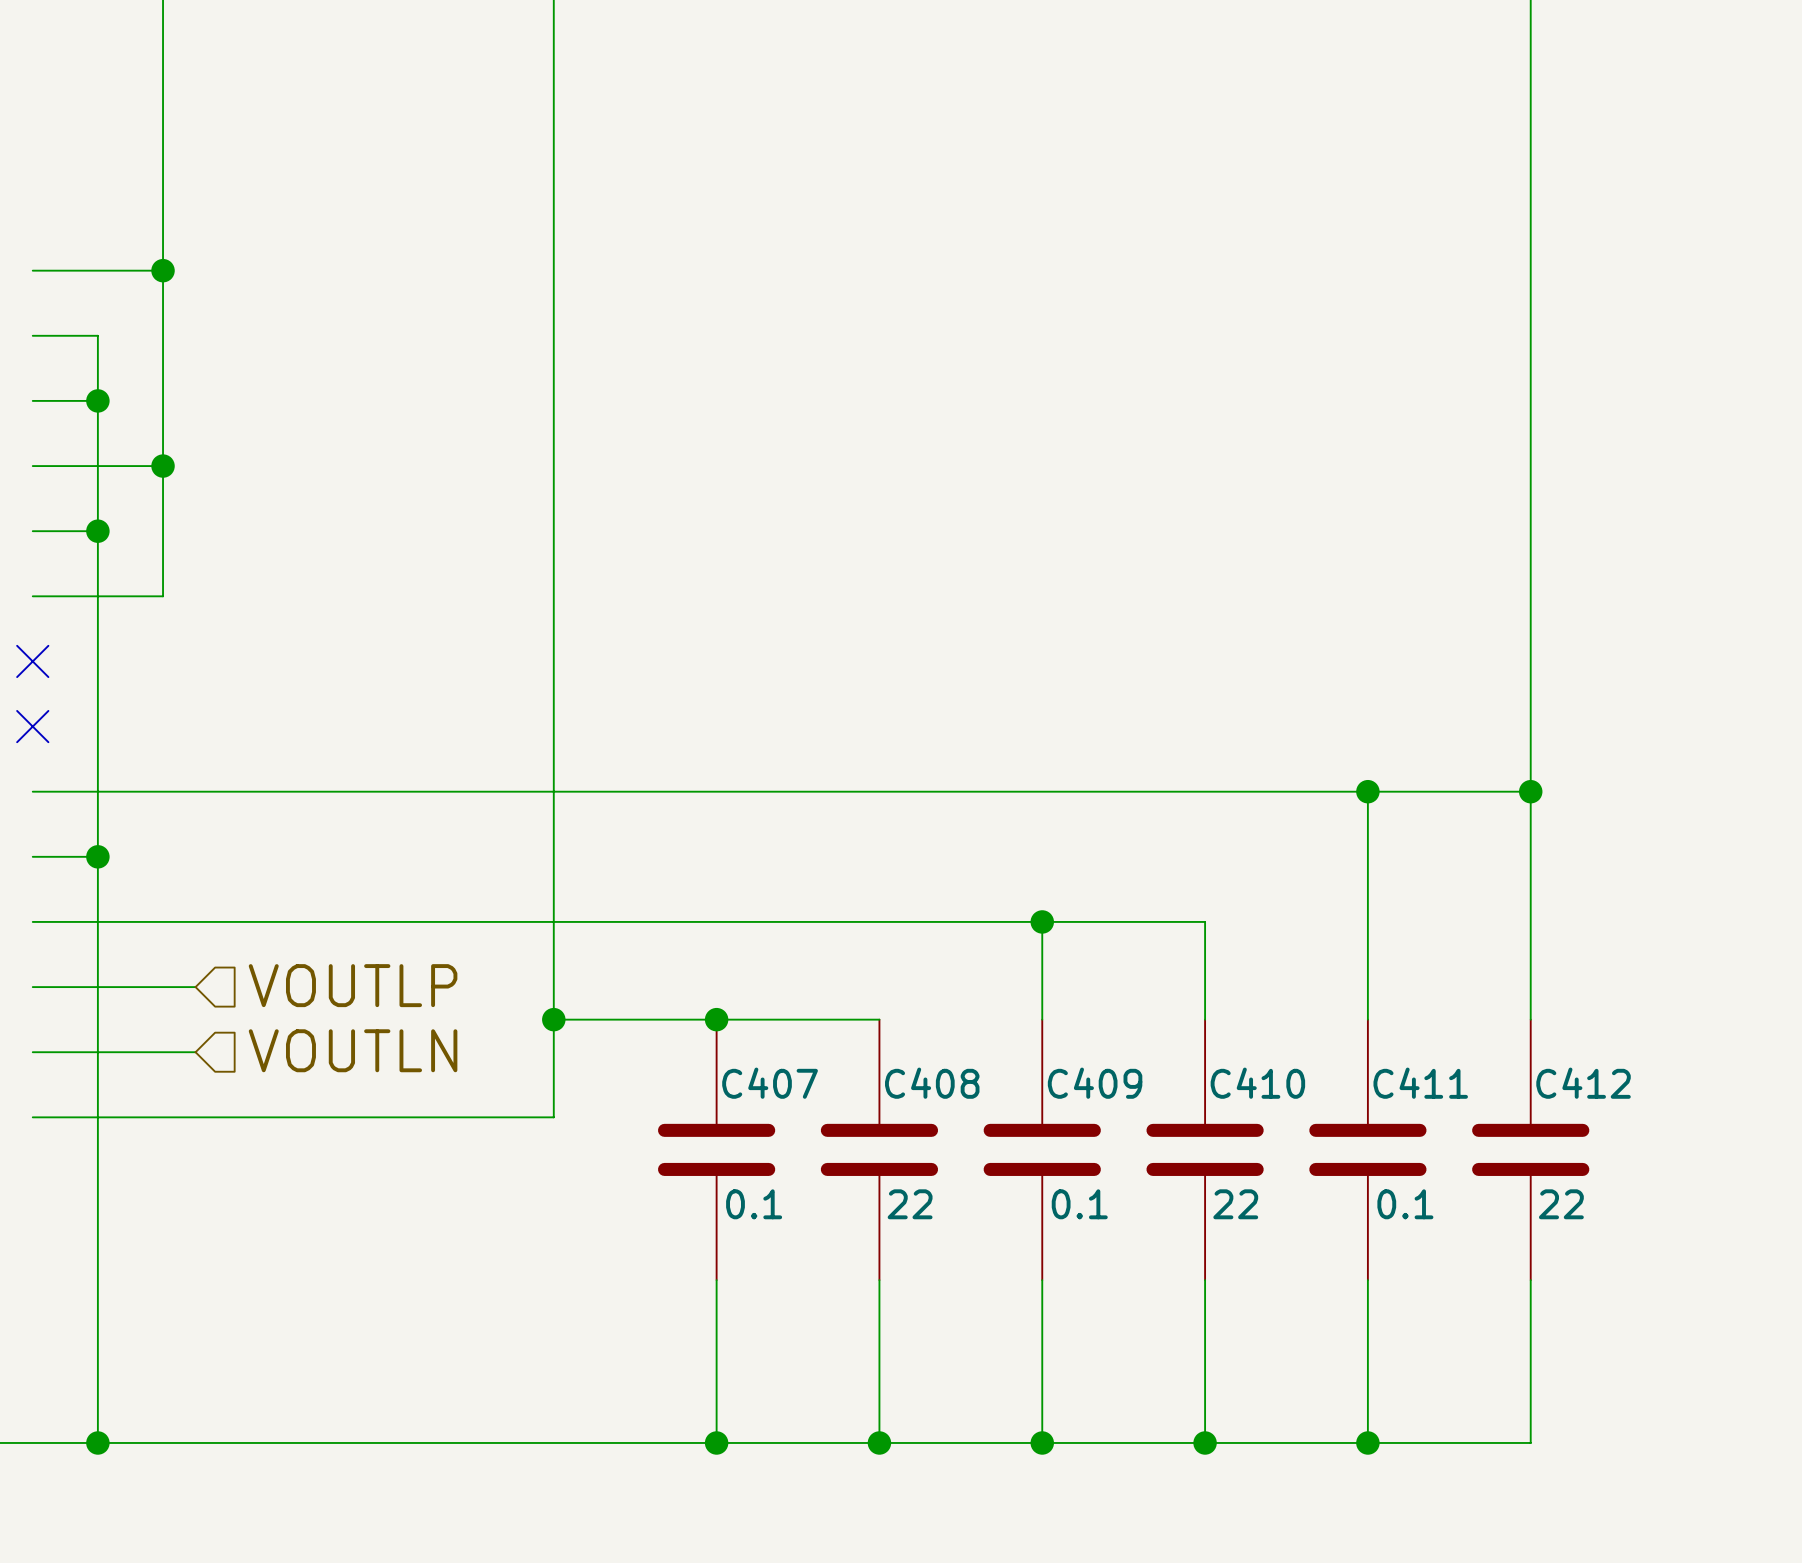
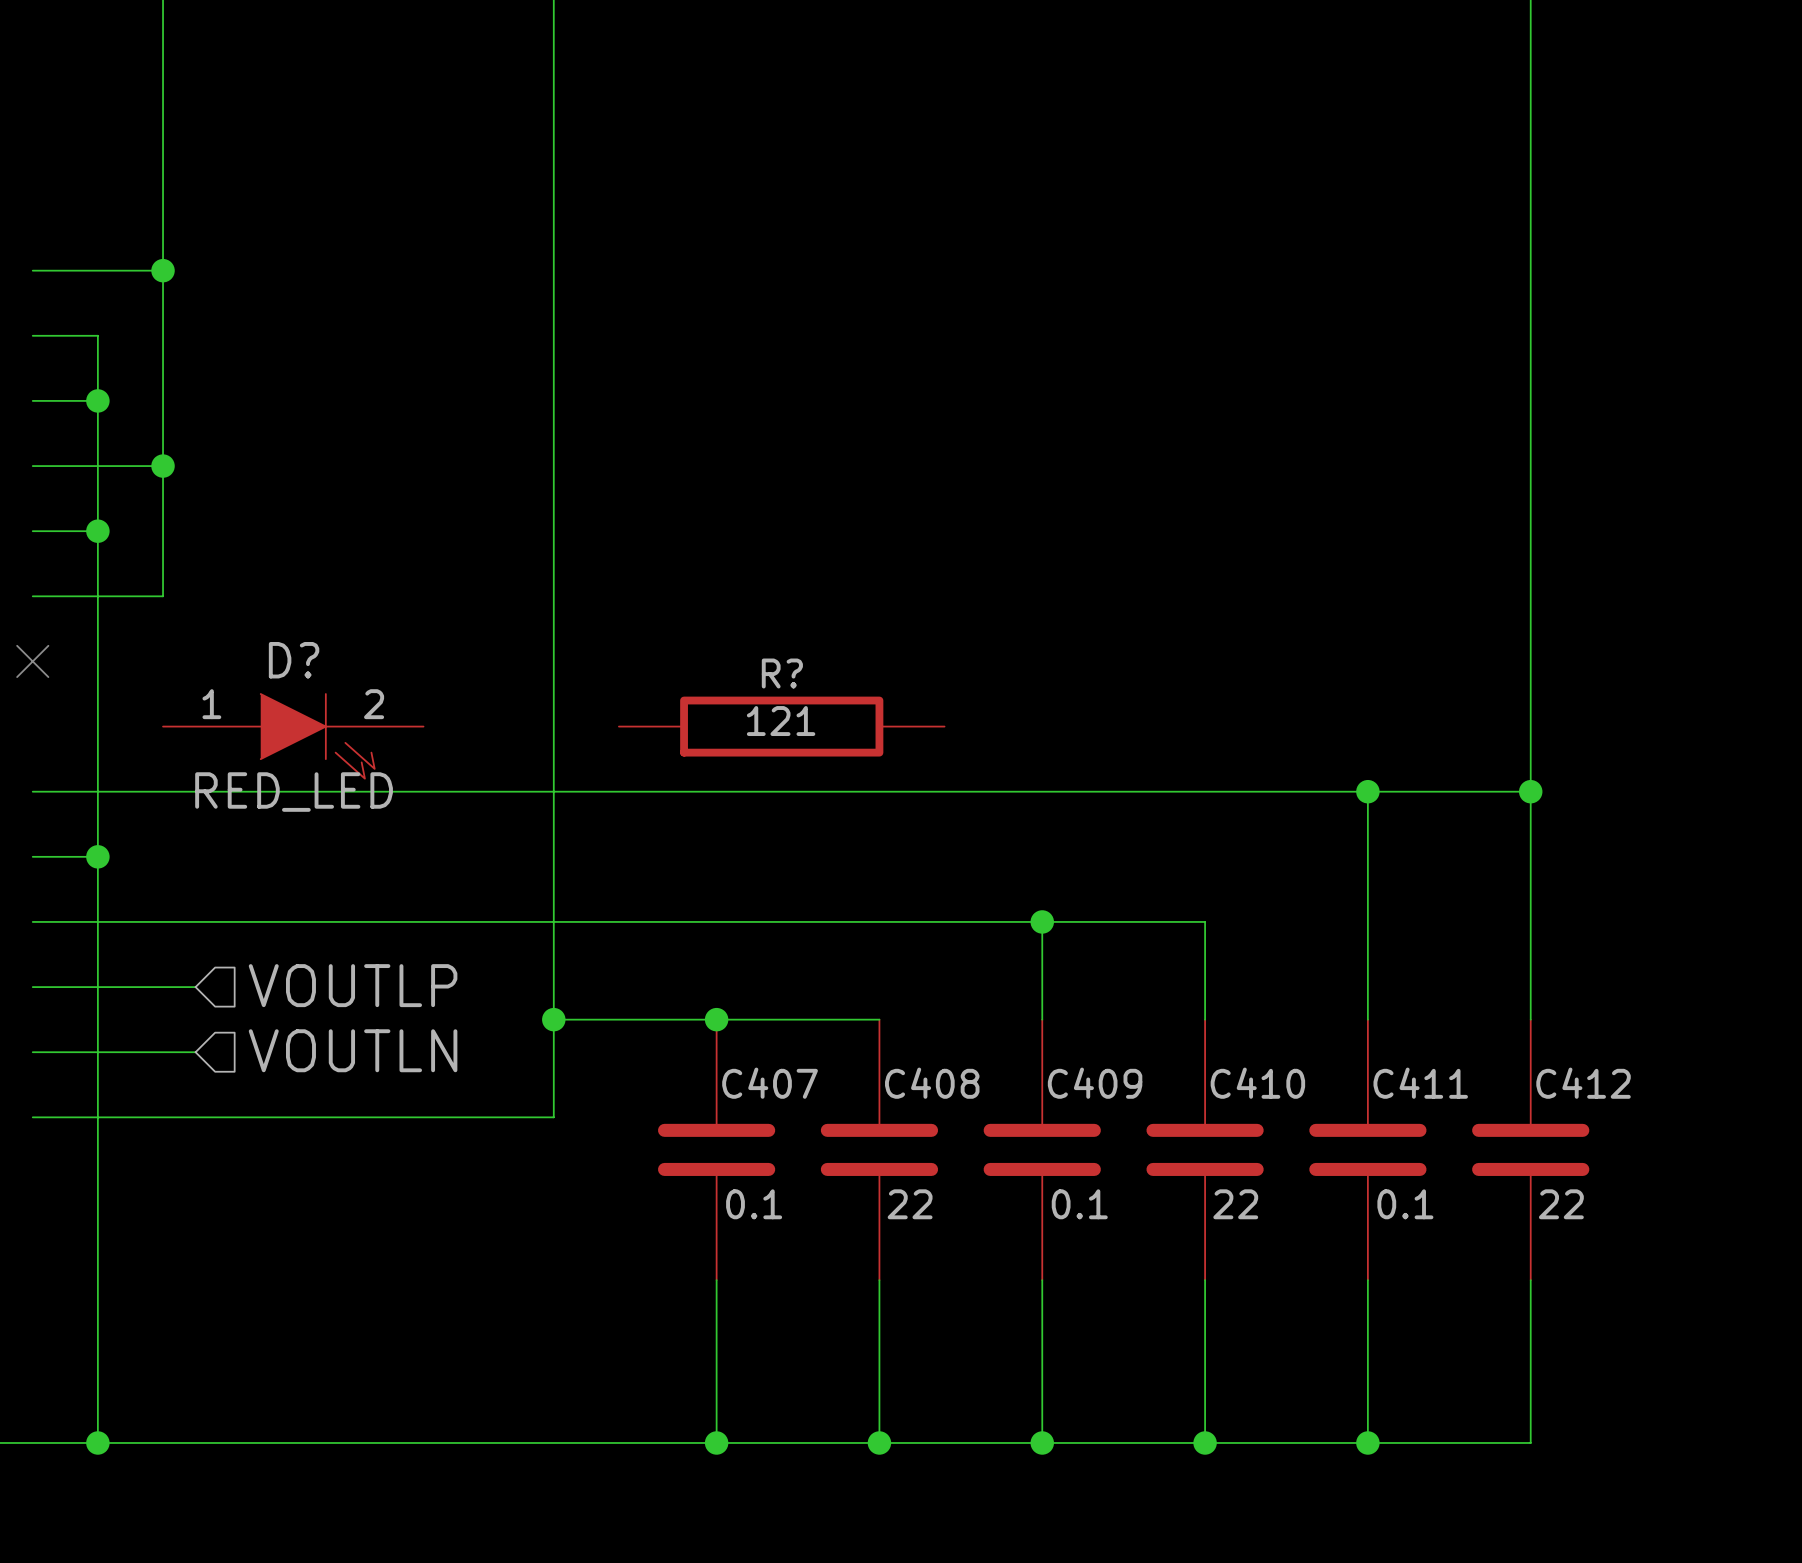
no-connect mark: (32, 726) -> none
R?: none -> 121 (781, 726)
D?: none -> RED_LED (293, 736)

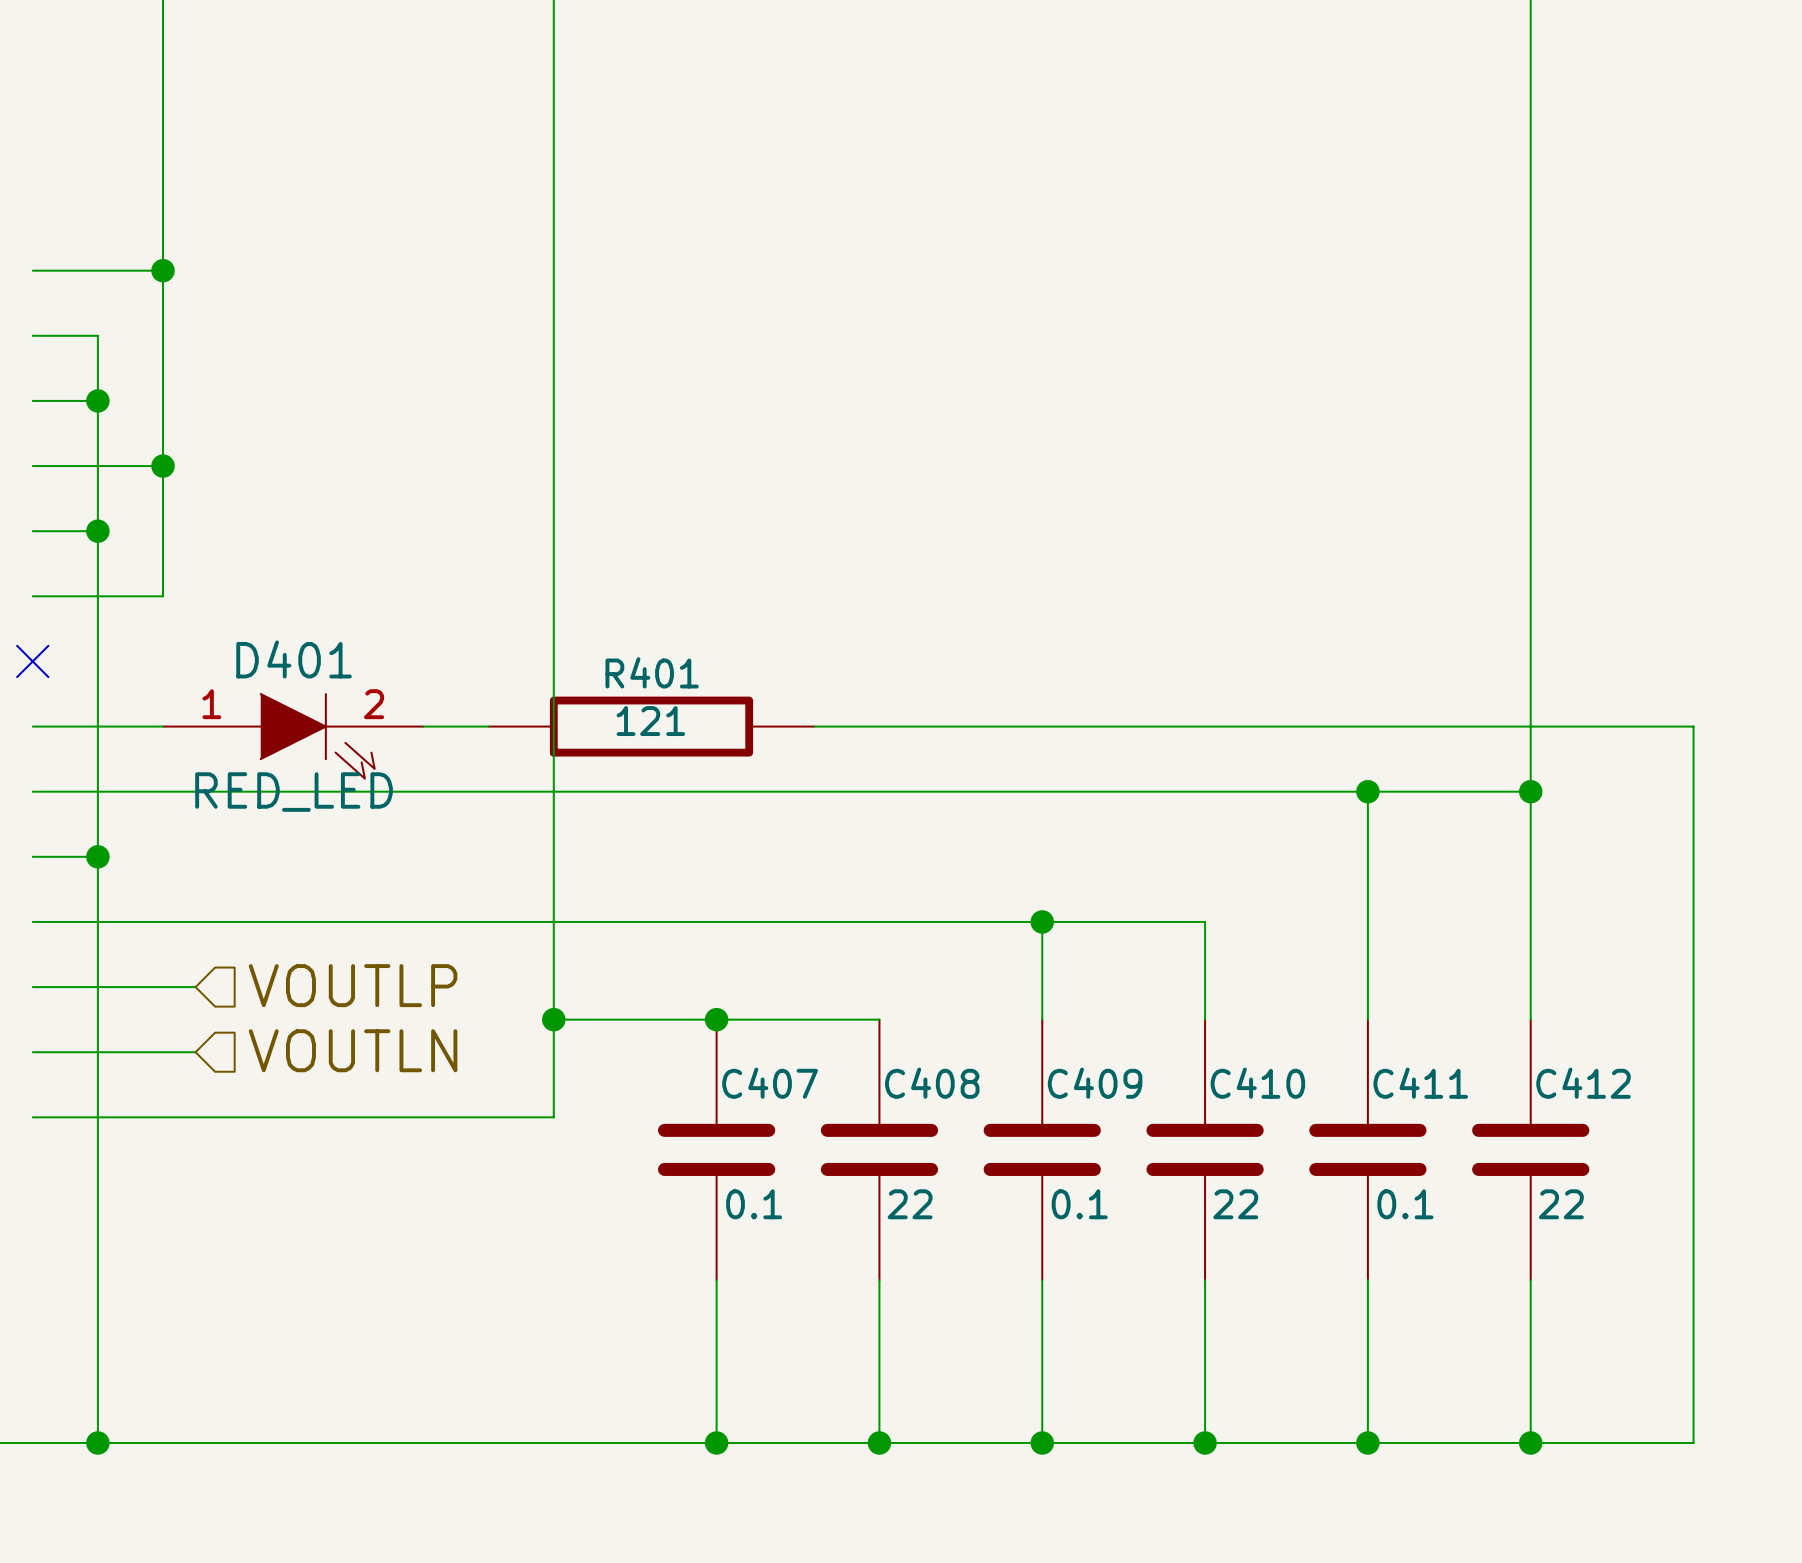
D? name: D? (294, 660) -> D401 (294, 659)
wire: none -> (32, 726) (163, 726)
wire: none -> (423, 726) (488, 726)
R401: none -> 121 (651, 726)
R?: 121 (781, 726) -> none
wire: none -> (814, 726) (1693, 726) (1693, 1442) (1530, 1442)
junction: none -> (1530, 1442)

